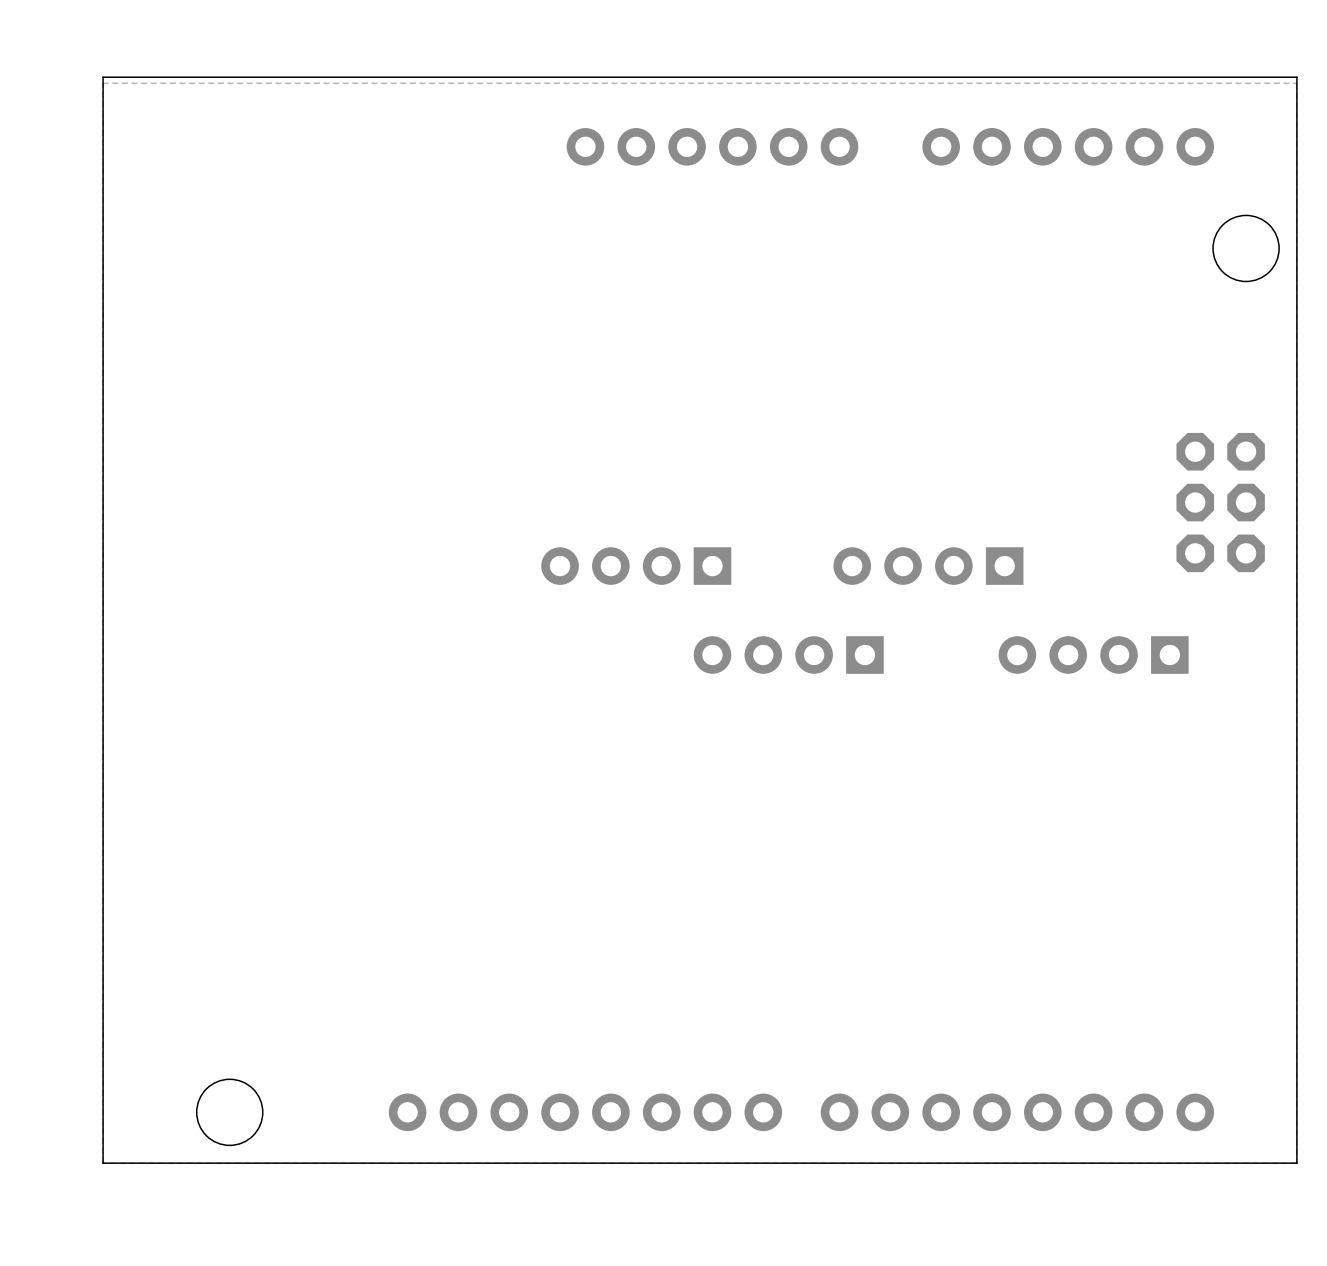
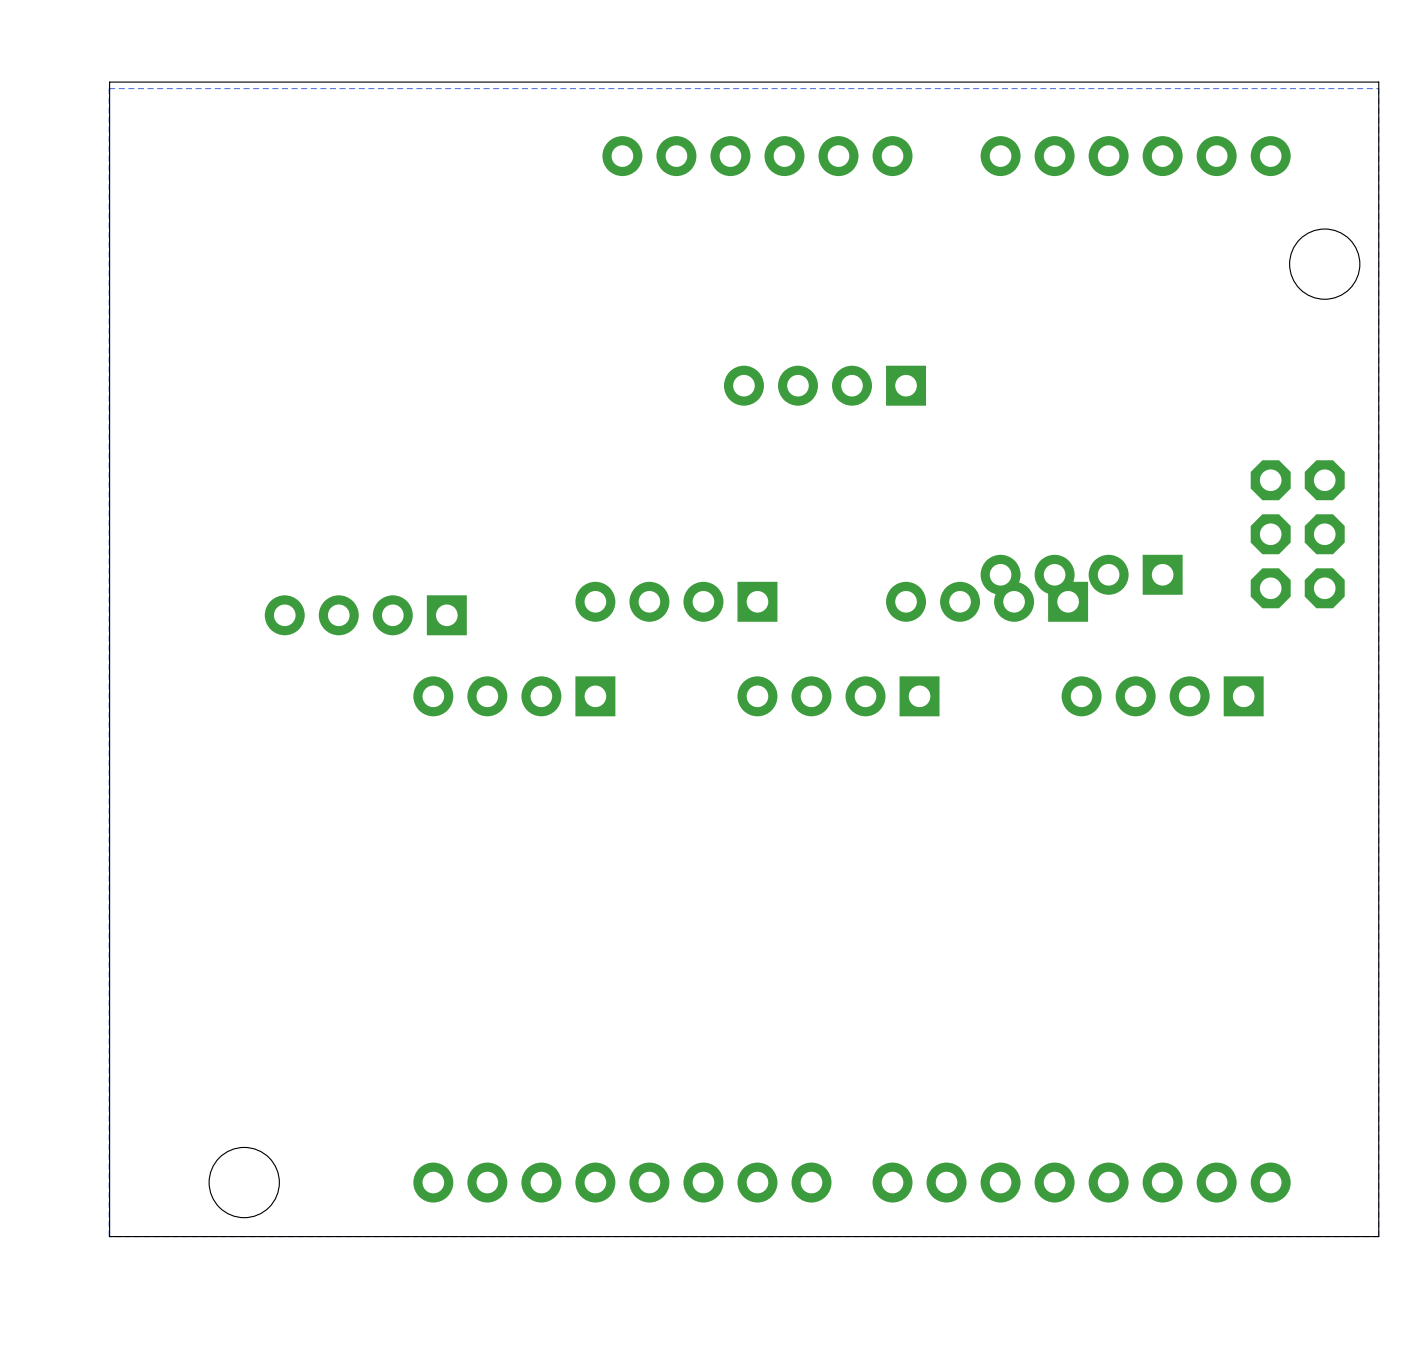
part: none -> (825, 385)
part: none -> (1081, 574)
part: none -> (365, 615)
part: none -> (514, 696)

